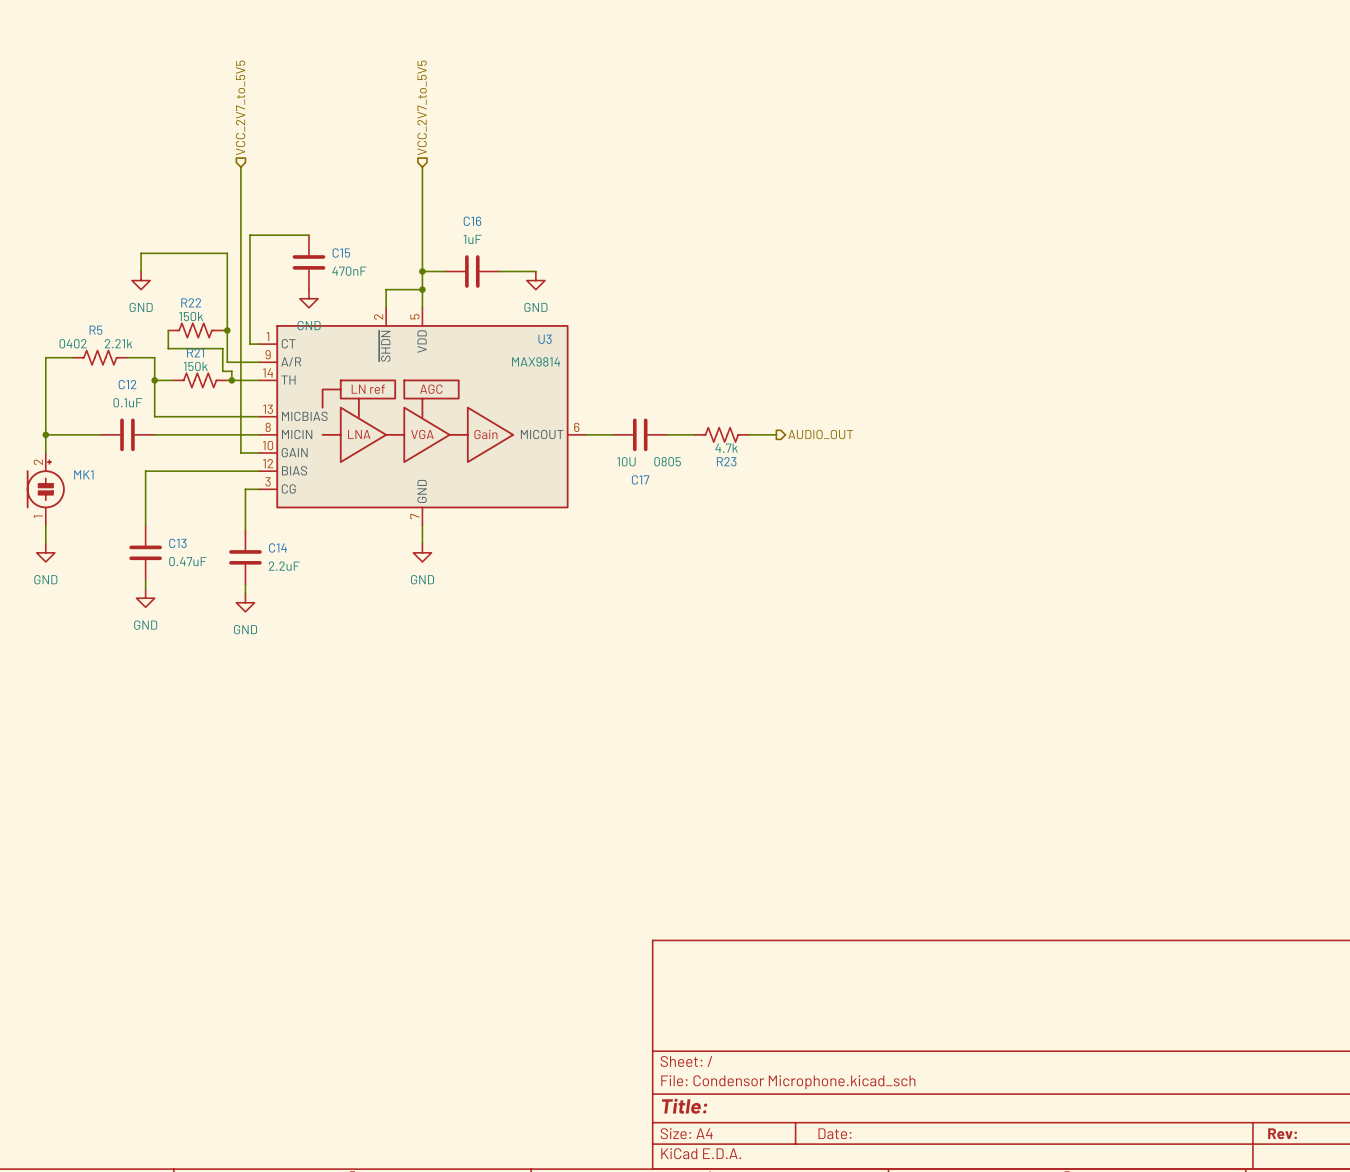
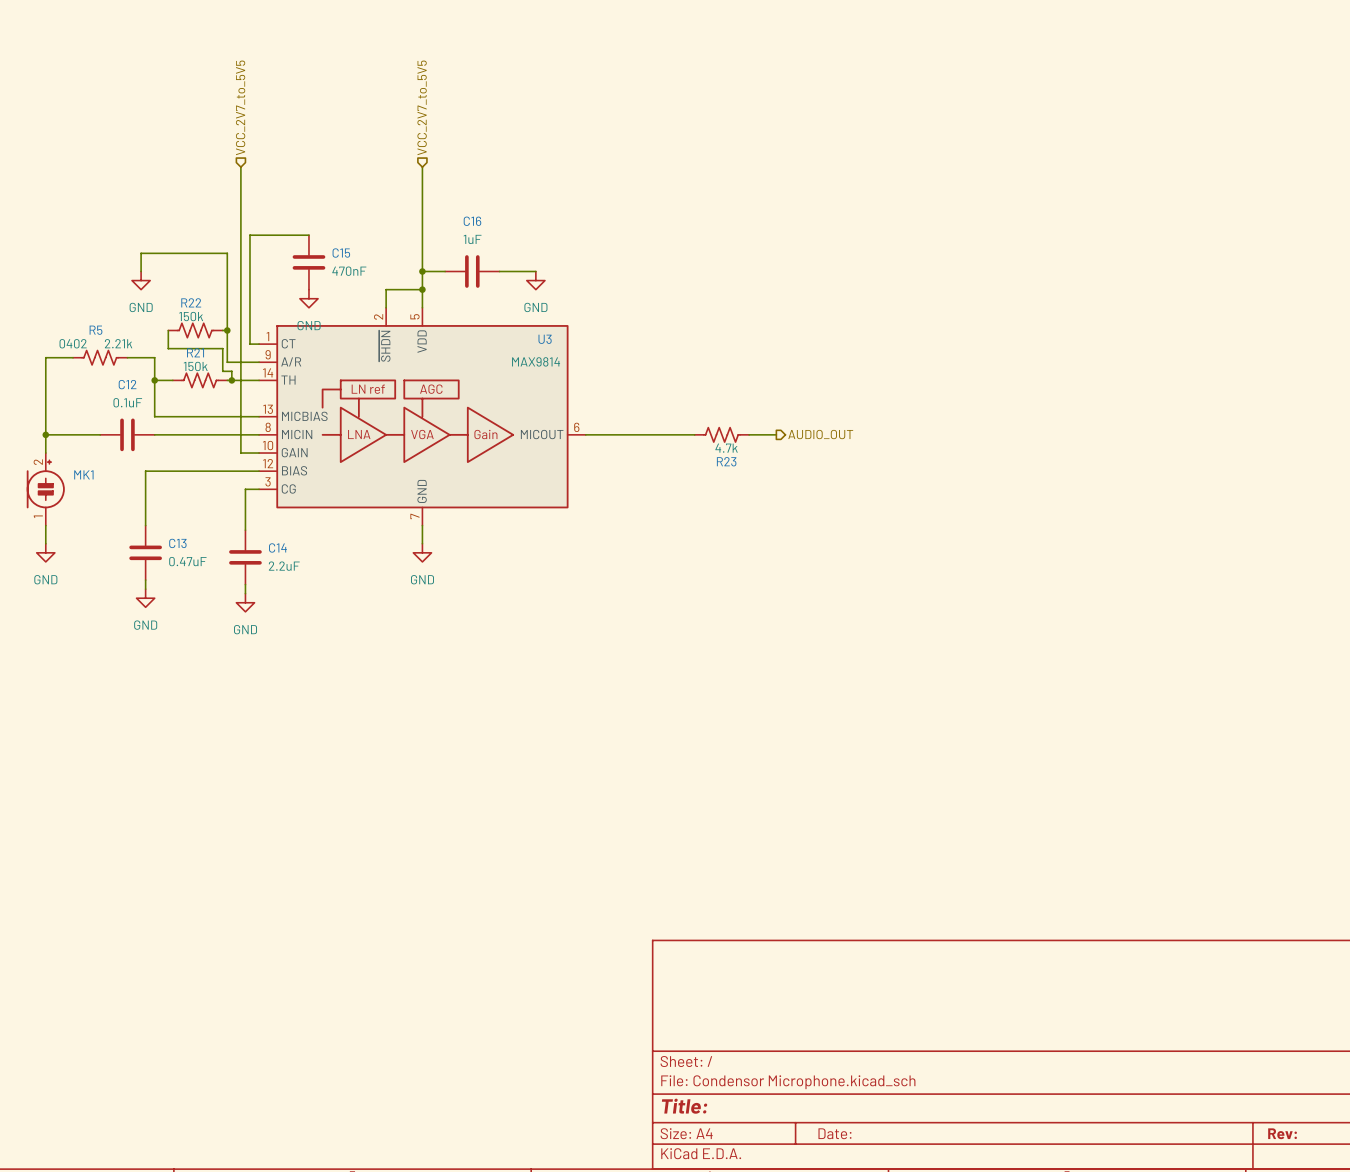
C17: 10U (640, 434) -> none

